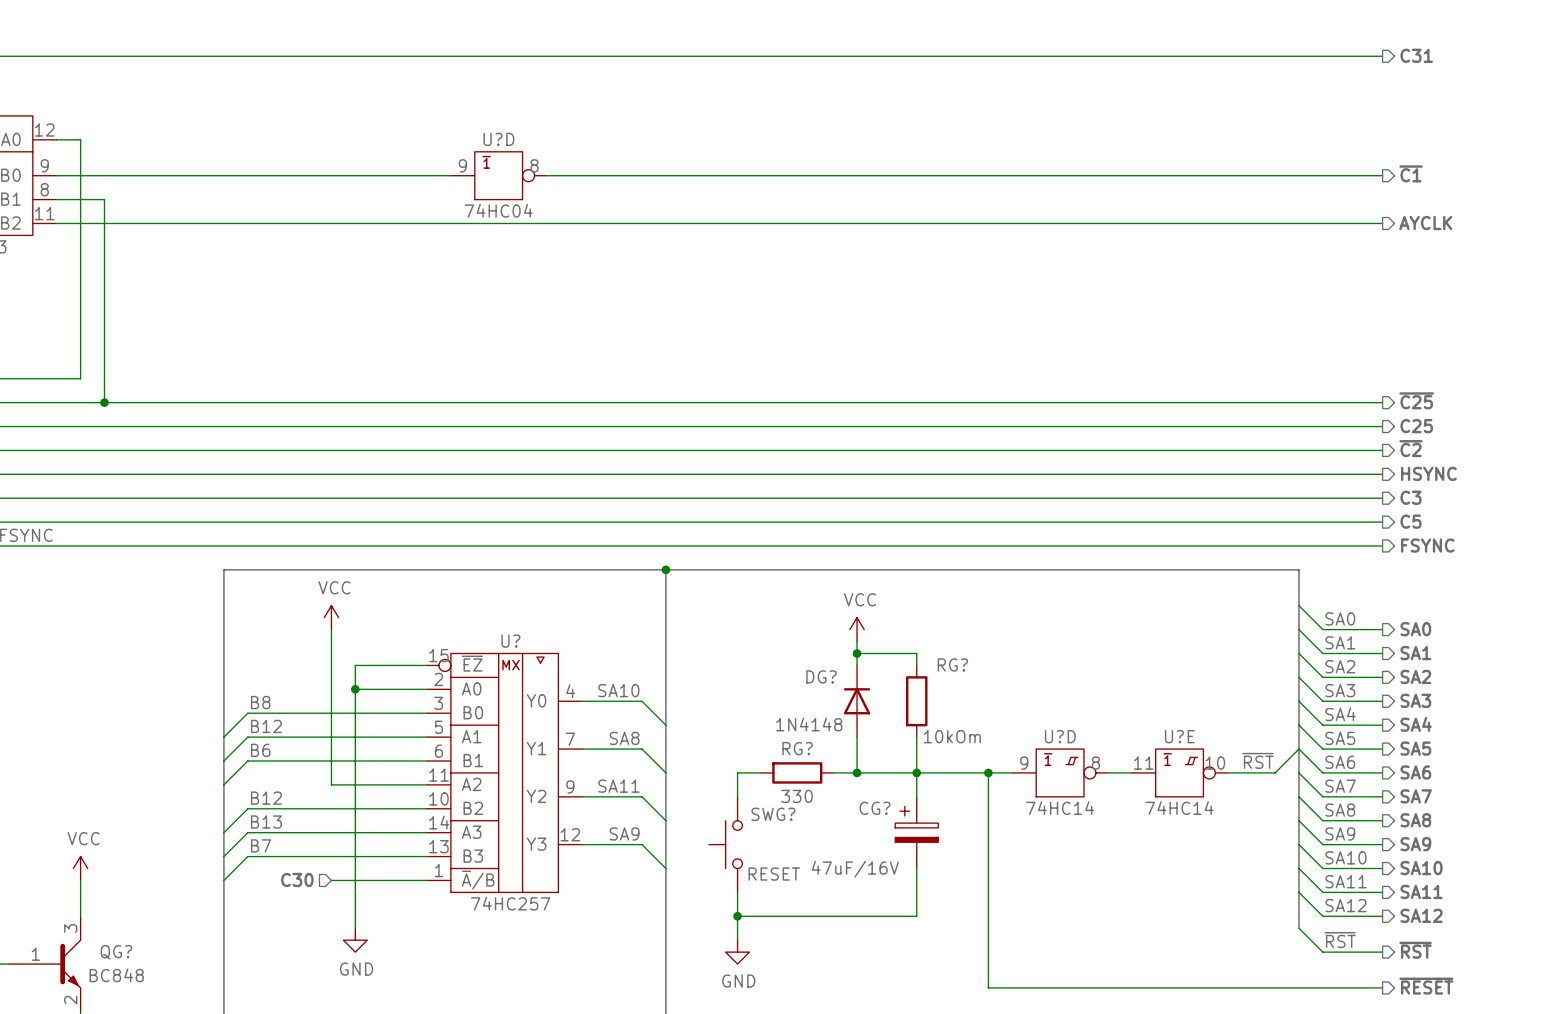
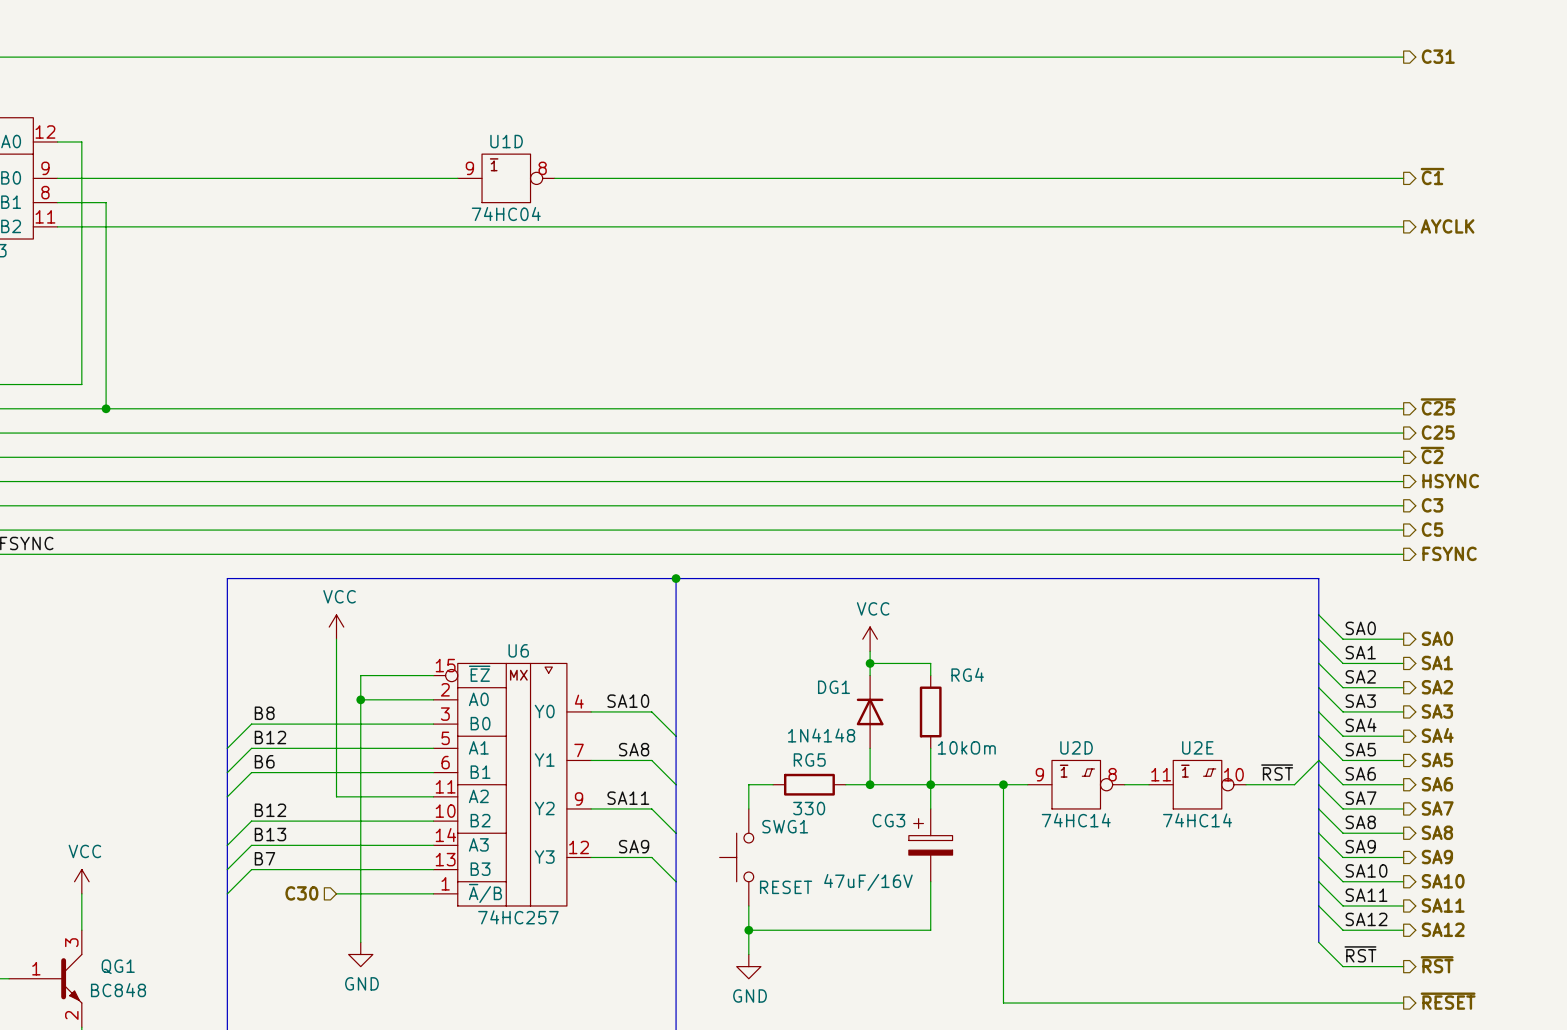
U?D name: U?D (498, 139) -> U1D (506, 141)
U? name: U? (510, 641) -> U6 (518, 650)
RG? name: RG? (952, 664) -> RG4 (967, 674)
DG? name: DG? (821, 676) -> DG1 (833, 687)
U?D name: U?D (1060, 736) -> U2D (1076, 747)
U?E name: U?E (1179, 736) -> U2E (1197, 747)
RG? name: RG? (797, 748) -> RG5 (809, 760)
CG? name: CG? (875, 808) -> CG3 (888, 820)
SWG? name: SWG? (773, 814) -> SWG1 (785, 826)
QG? name: QG? (116, 952) -> QG1 (118, 966)

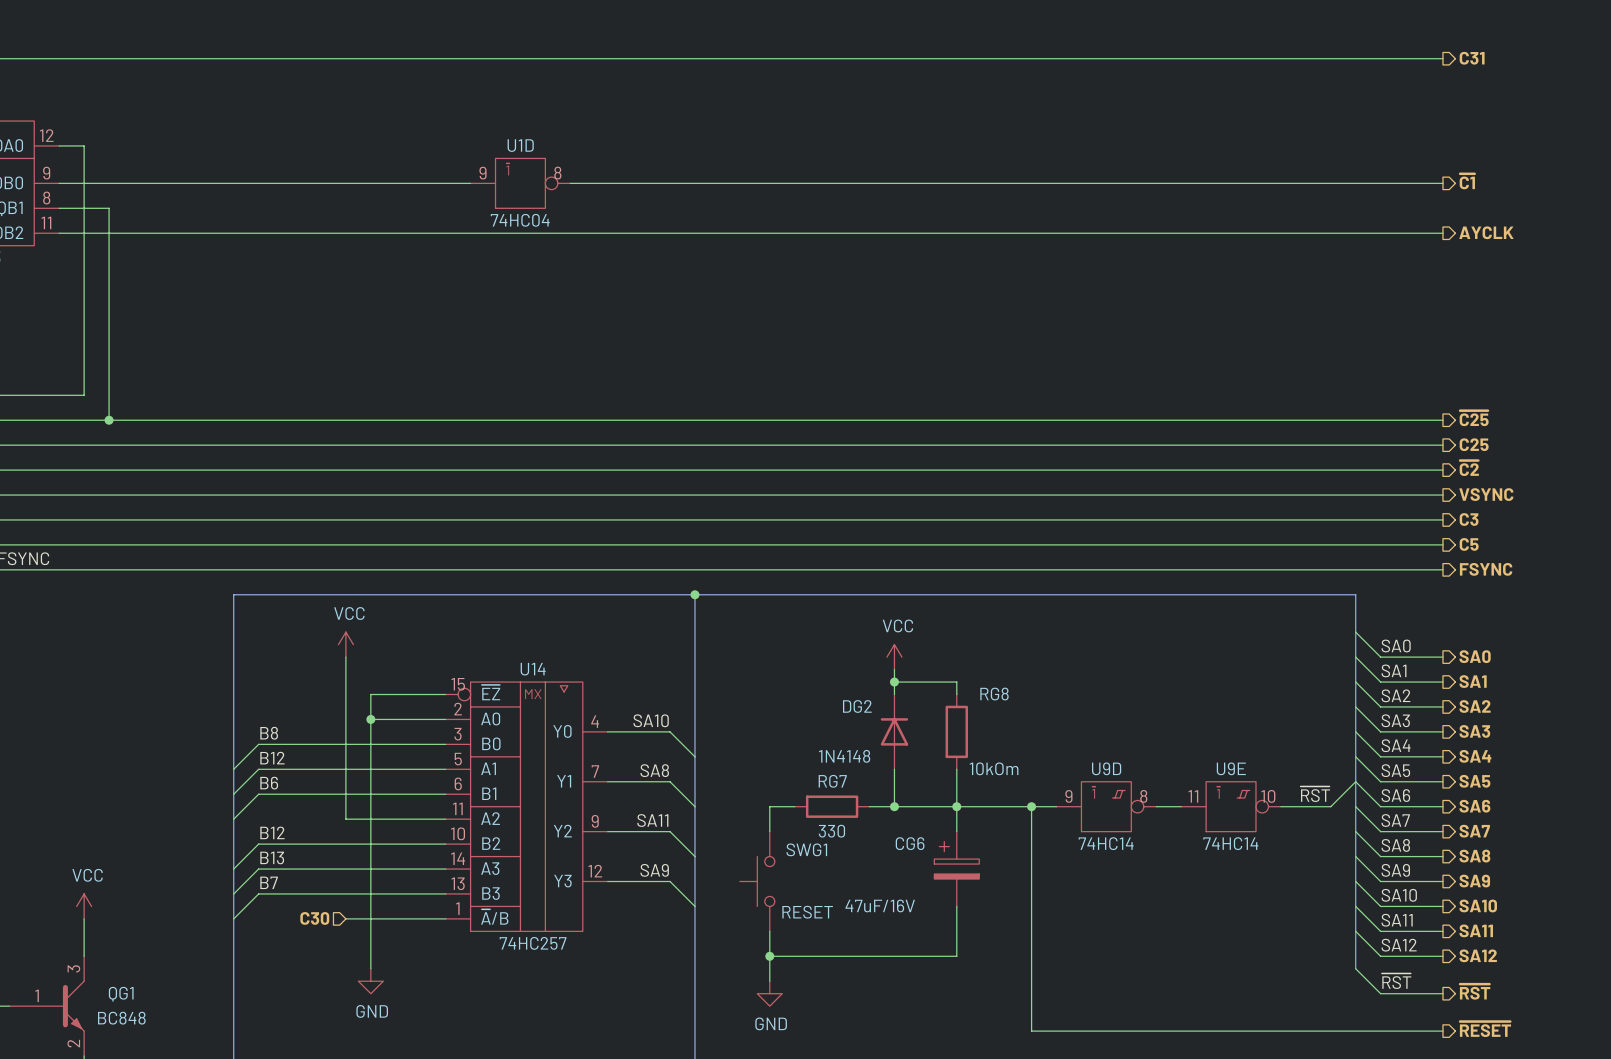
hierarchical label: HSYNC (1450, 481) -> VSYNC (1486, 494)
U6 name: U6 (518, 650) -> U14 (533, 669)
RG4 name: RG4 (967, 674) -> RG8 (994, 694)
DG1 name: DG1 (833, 687) -> DG2 (857, 706)
U2D name: U2D (1076, 747) -> U9D (1106, 768)
U2E name: U2E (1197, 747) -> U9E (1231, 768)
RG5 name: RG5 (809, 760) -> RG7 (832, 781)
CG3 name: CG3 (888, 820) -> CG6 (910, 843)

